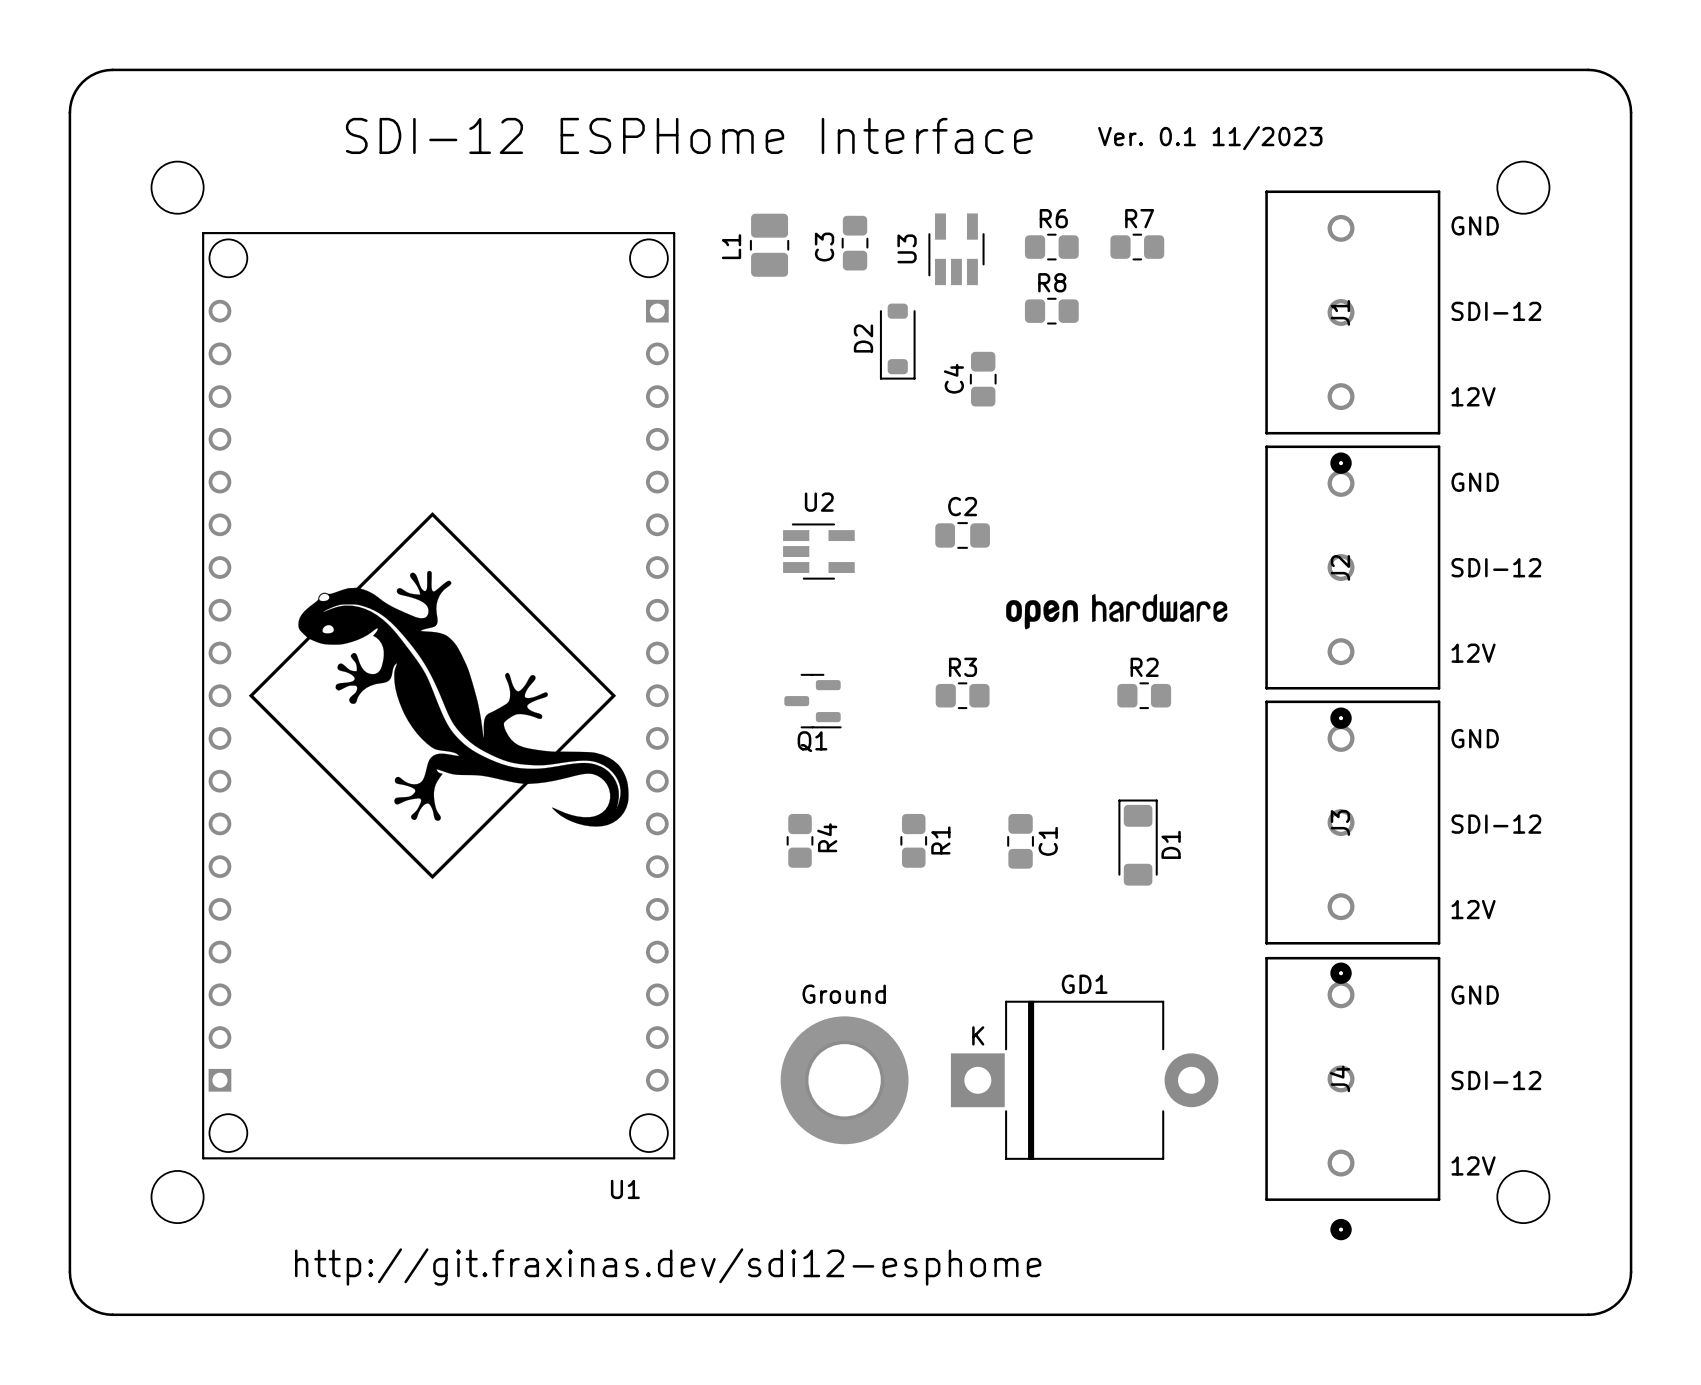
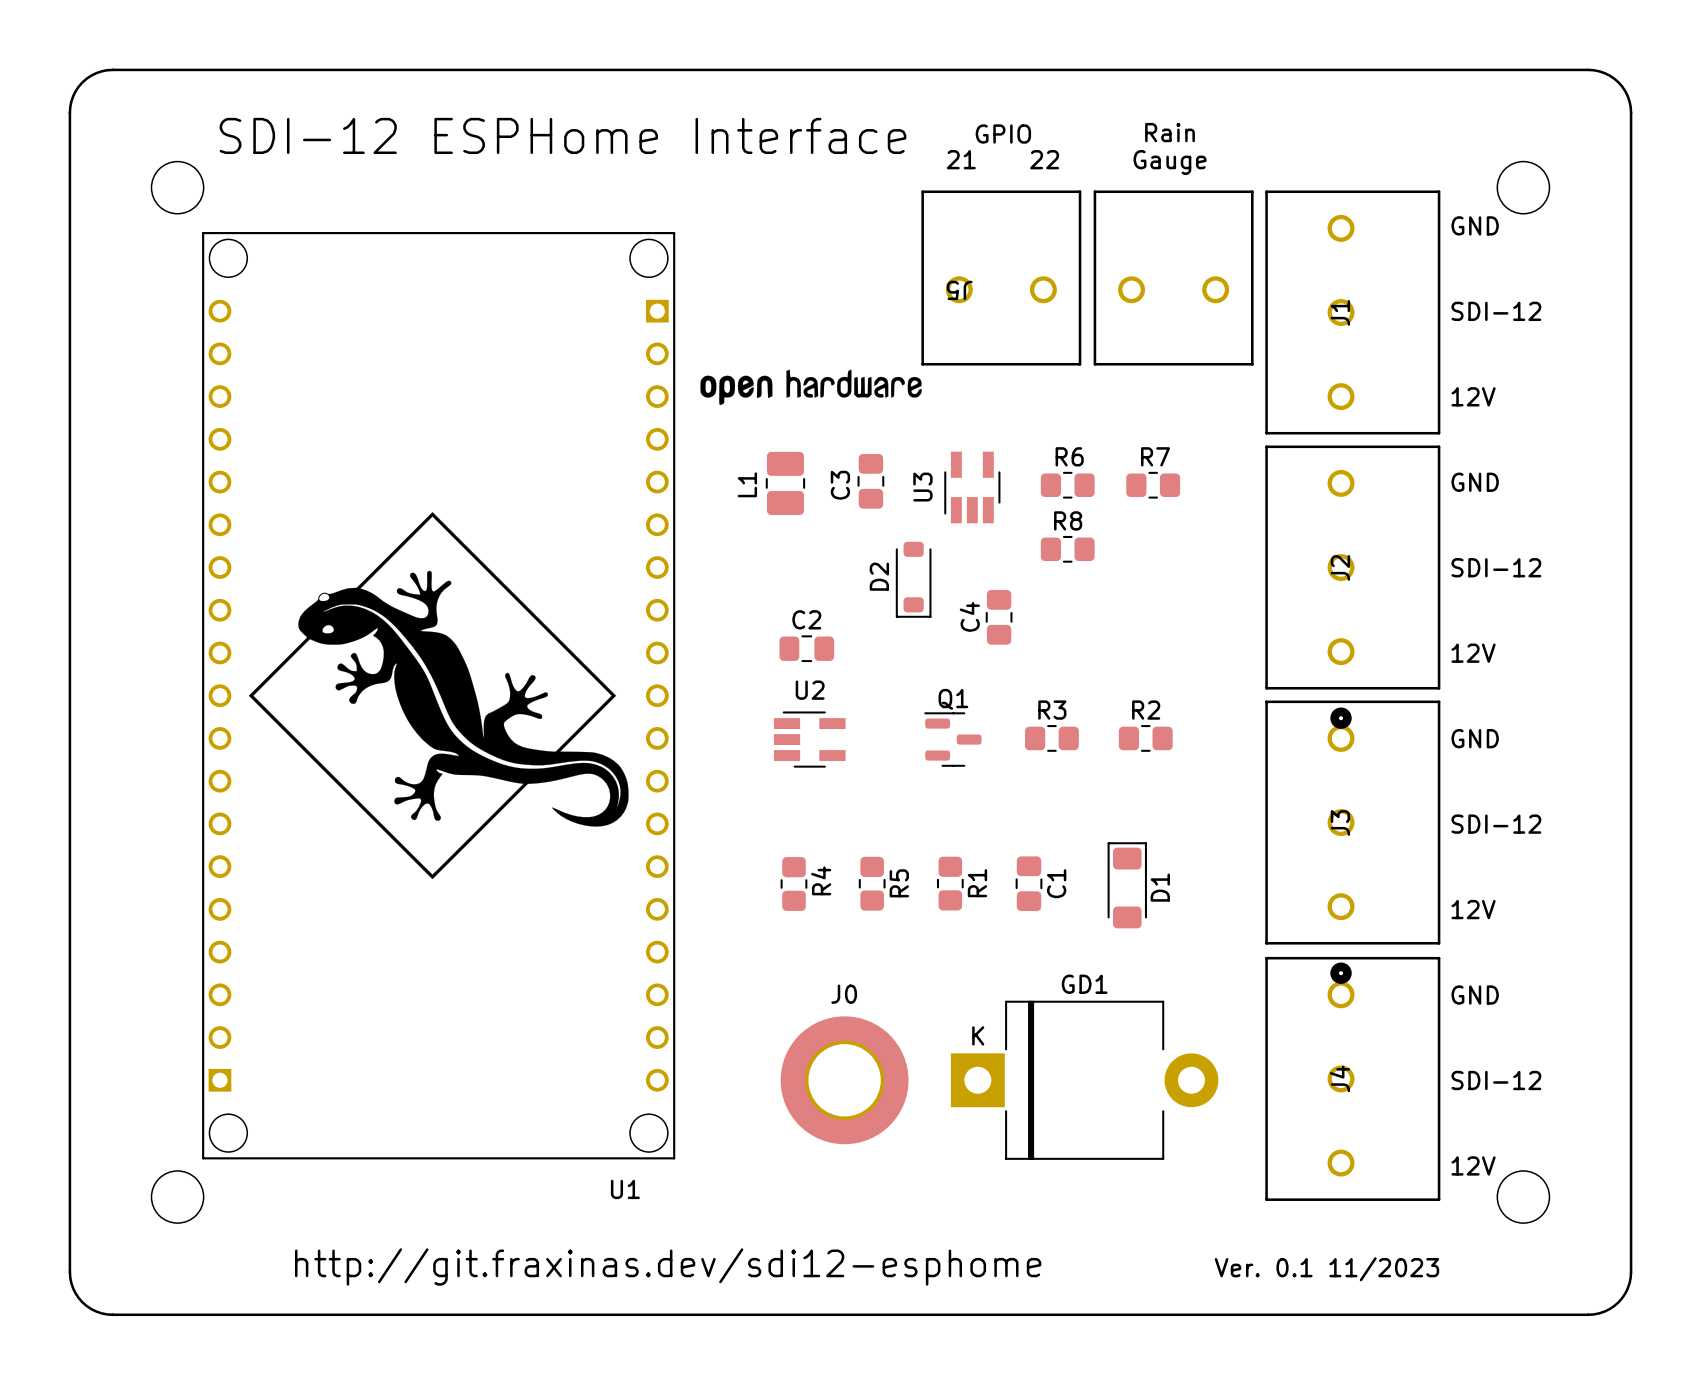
text: none -> Rain (1170, 132)
text: none -> GPIO (1003, 134)
text position: SDI-12 ESPHome Interface (689, 135) -> SDI-12 ESPHome Interface (563, 135)
text: Ver. 0.1 11/2023 (1210, 138) -> none
text: none -> 21 22 (1002, 159)
text: none -> Gauge (1170, 162)
J1 footprint: [1265, 190, 1441, 474] -> [1265, 190, 1441, 435]
C3 position: (855, 243) -> (870, 481)
L1 position: (769, 245) -> (785, 483)
R6 position: (1051, 247) -> (1067, 485)
R7 position: (1137, 247) -> (1153, 485)
U3 position: (956, 249) -> (972, 487)
J5: none -> (1001, 278)
part: none -> (1173, 278)
R8 position: (1051, 311) -> (1067, 549)
D2 position: (897, 341) -> (913, 579)
C4 position: (983, 379) -> (999, 617)
C2 position: (962, 535) -> (806, 648)
U2 position: (818, 551) -> (809, 739)
drawing position: (1116, 611) -> (811, 387)
R3 position: (962, 695) -> (1051, 738)
R2 position: (1144, 695) -> (1145, 738)
Q1 rotation: 0° (813, 701) -> 180° (952, 739)
Q1 position: (813, 701) -> (952, 739)
R4 position: (800, 840) -> (793, 883)
R1 position: (913, 840) -> (950, 883)
C1 position: (1020, 841) -> (1029, 883)
D1 position: (1138, 842) -> (1127, 885)
R5: none -> (872, 883)
J4 footprint: [1265, 956, 1441, 1241] -> [1265, 956, 1441, 1201]
Ground name: Ground (844, 994) -> J0 (844, 994)
text: none -> Ver. 0.1 11/2023 (1326, 1269)

